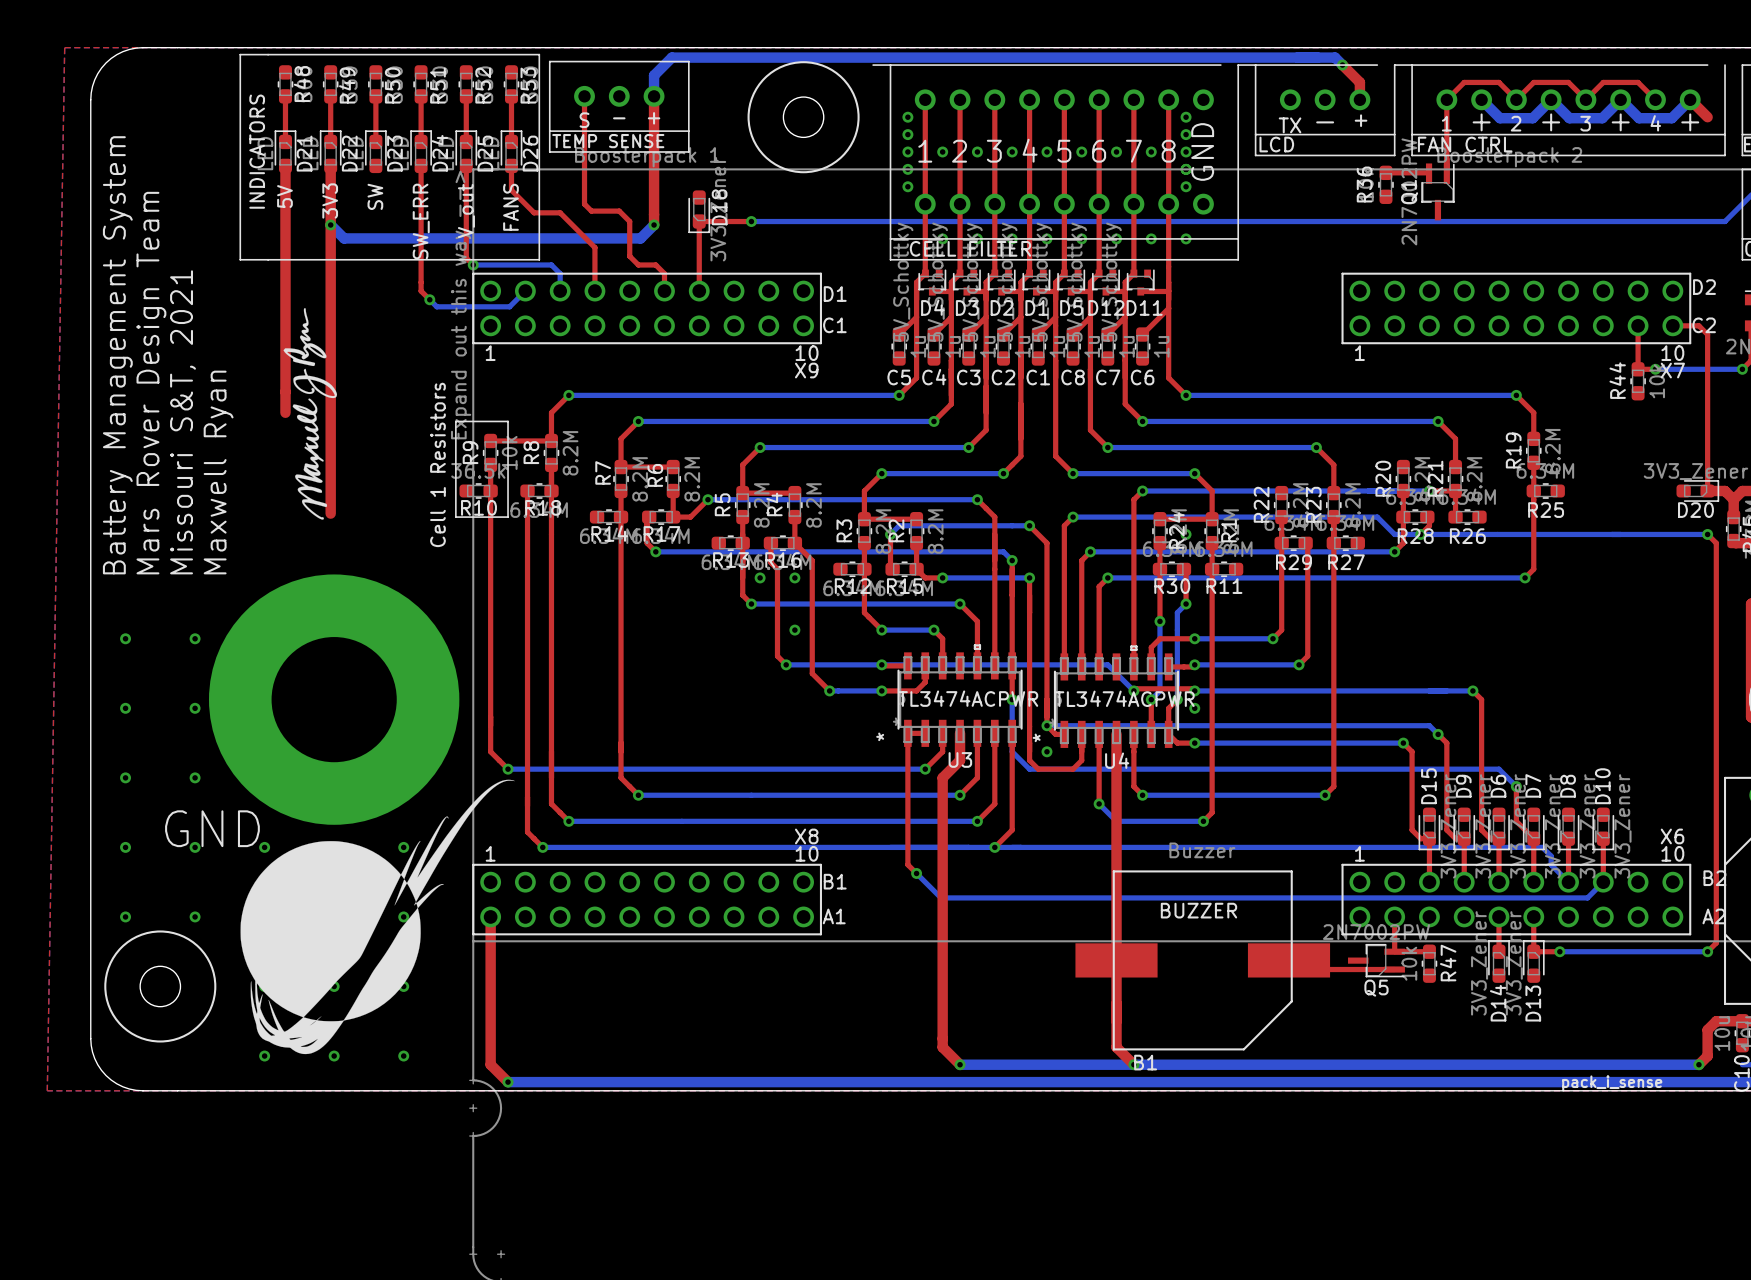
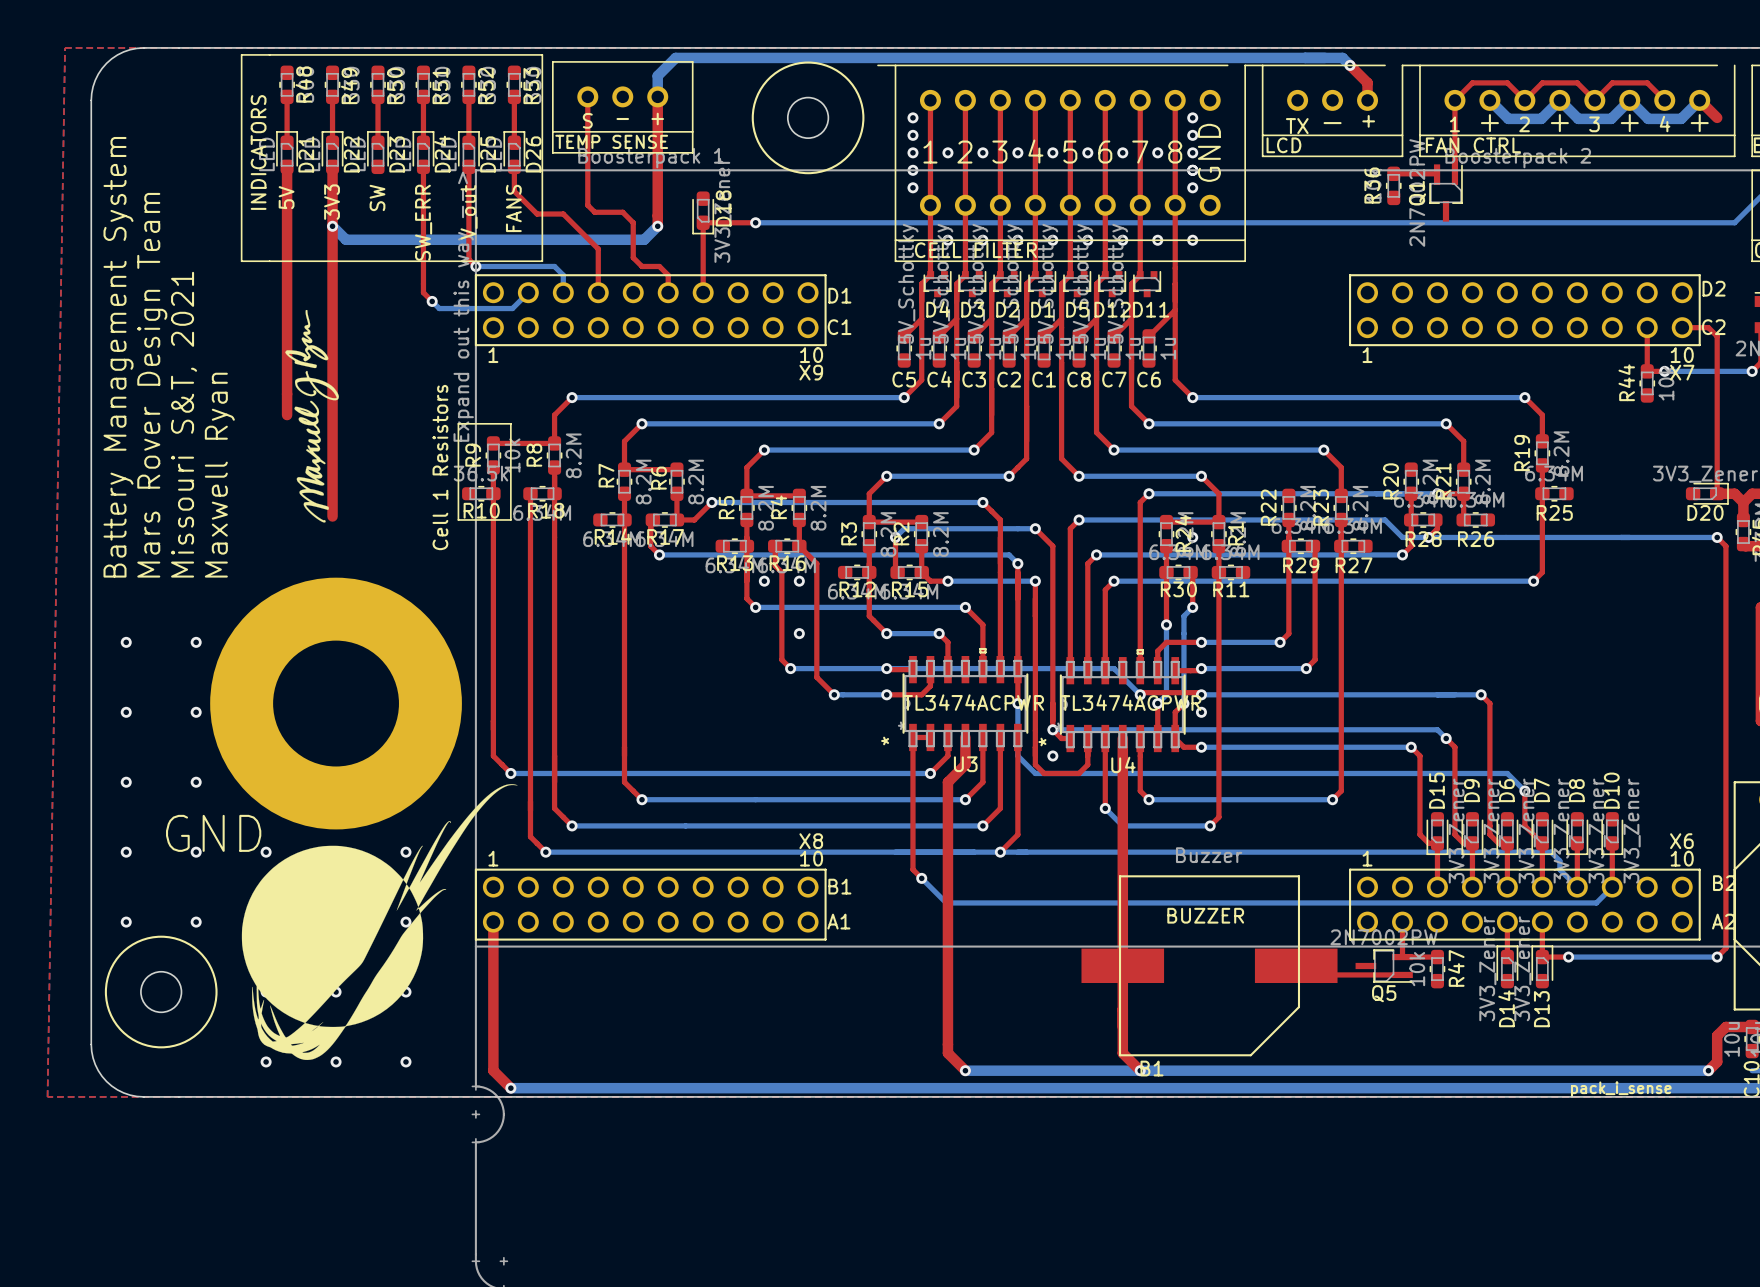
top track: (951, 291) (932, 291) -> none
top track: (986, 291) (966, 291) -> none
top track: (1020, 291) (1001, 291) -> none
top track: (1055, 291) (1036, 291) -> none
top track: (1090, 291) (1071, 291) -> none
top track: (1125, 291) (1105, 291) -> none
top track: (1168, 291) (1140, 291) -> none

